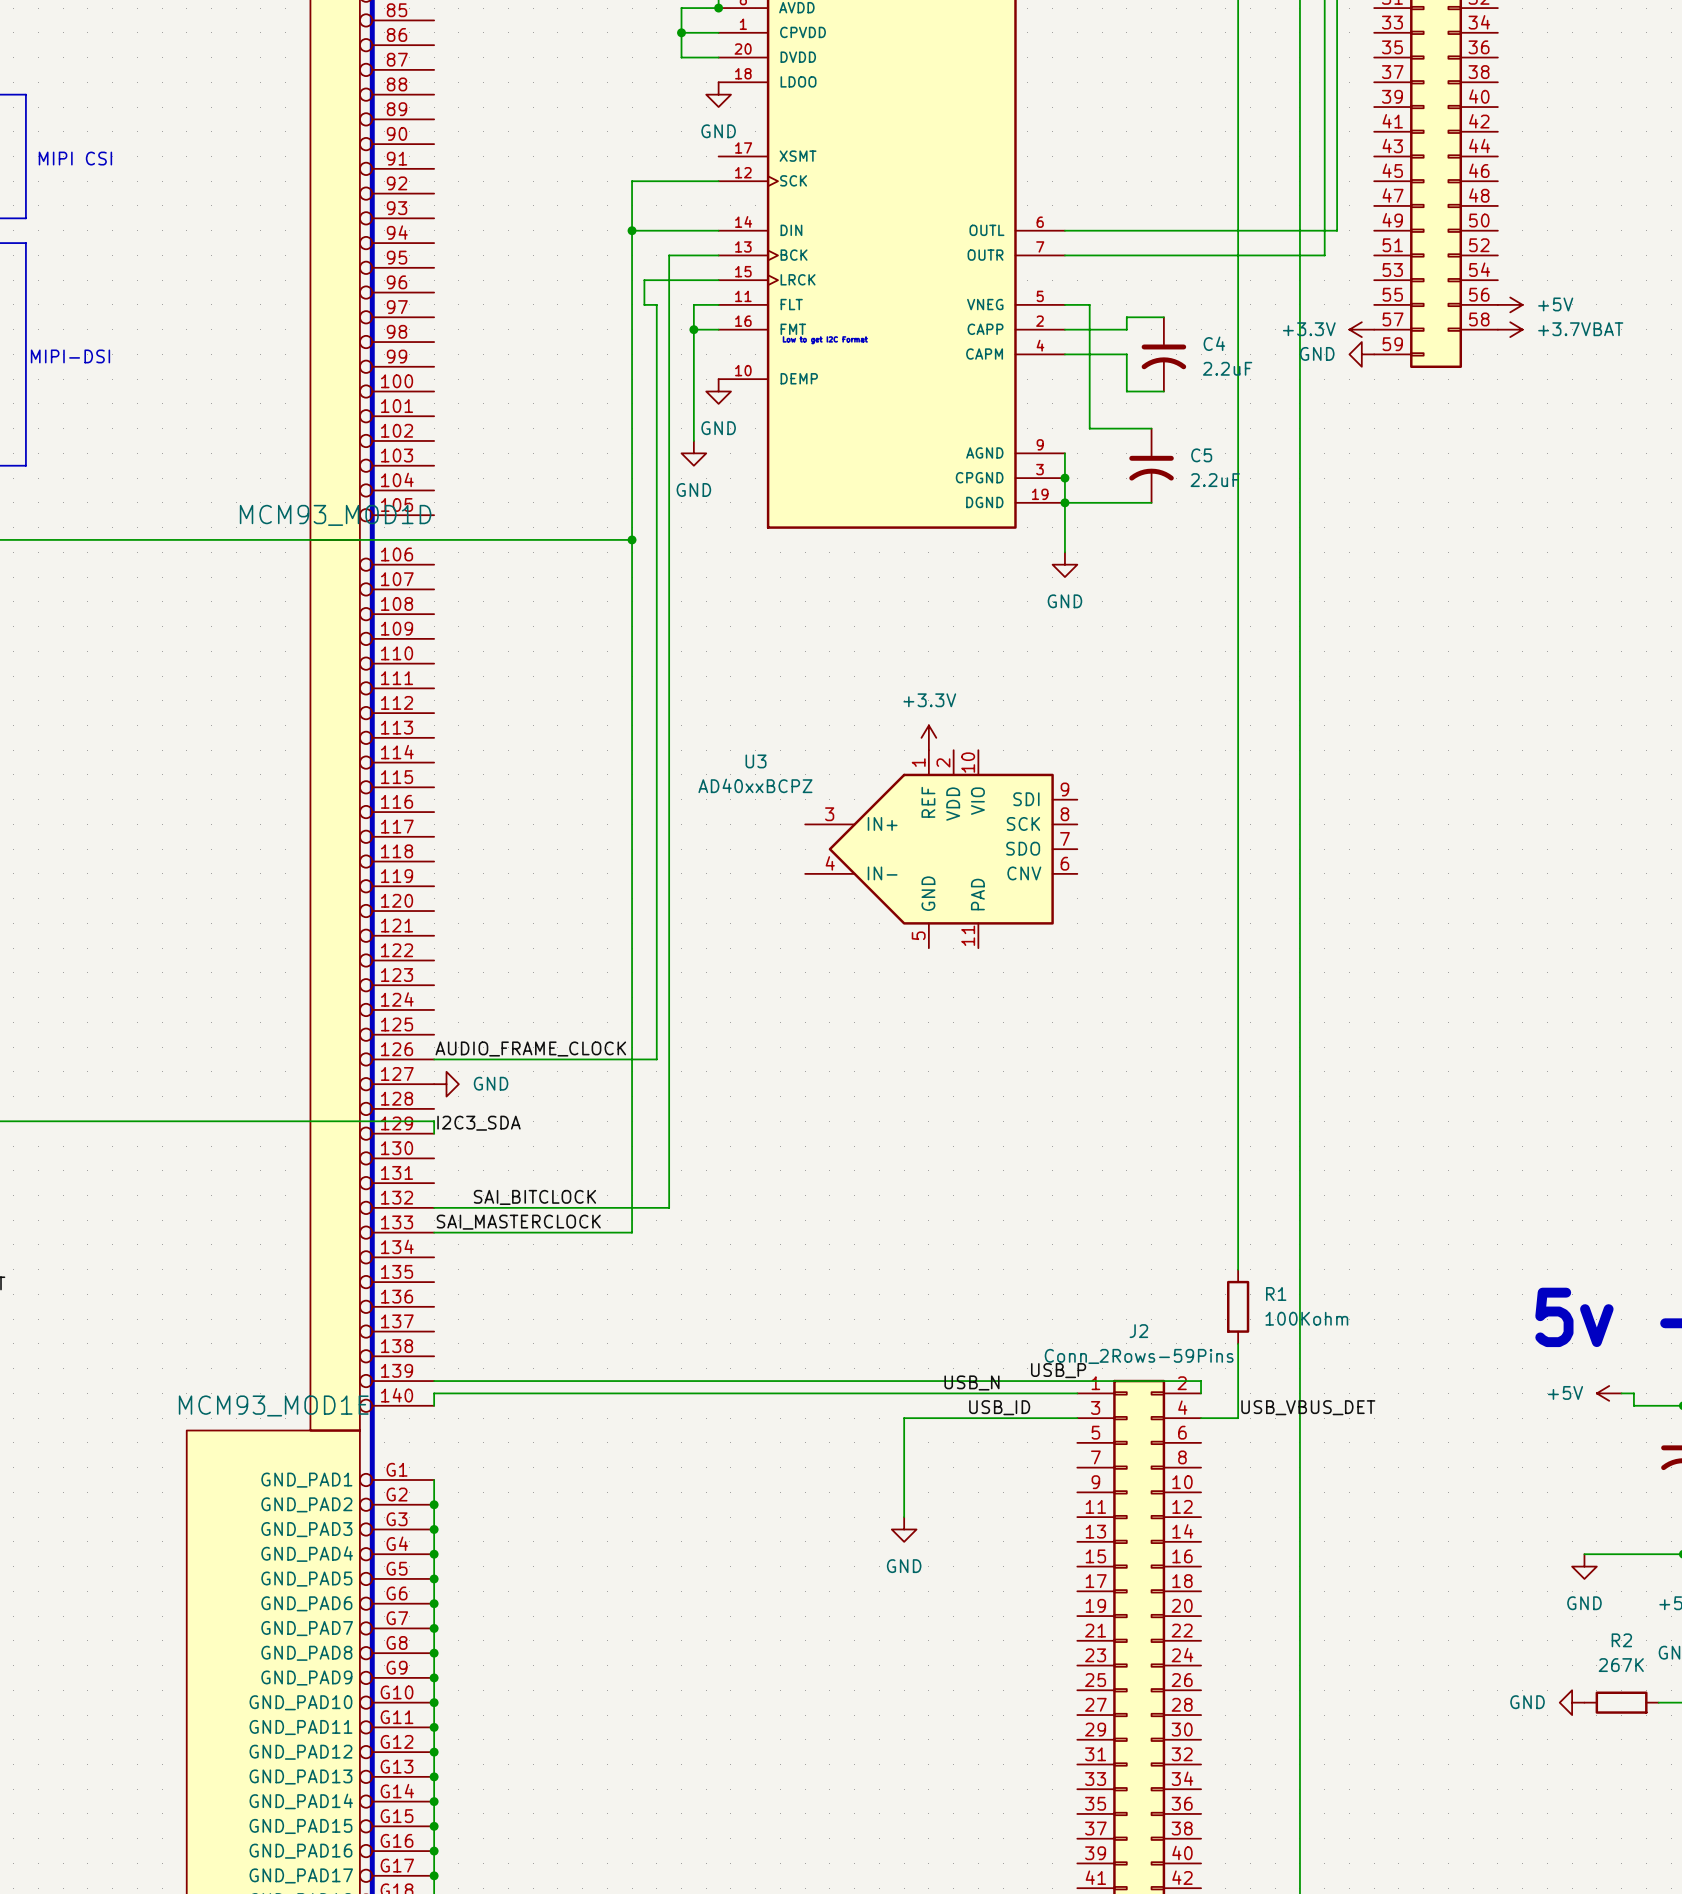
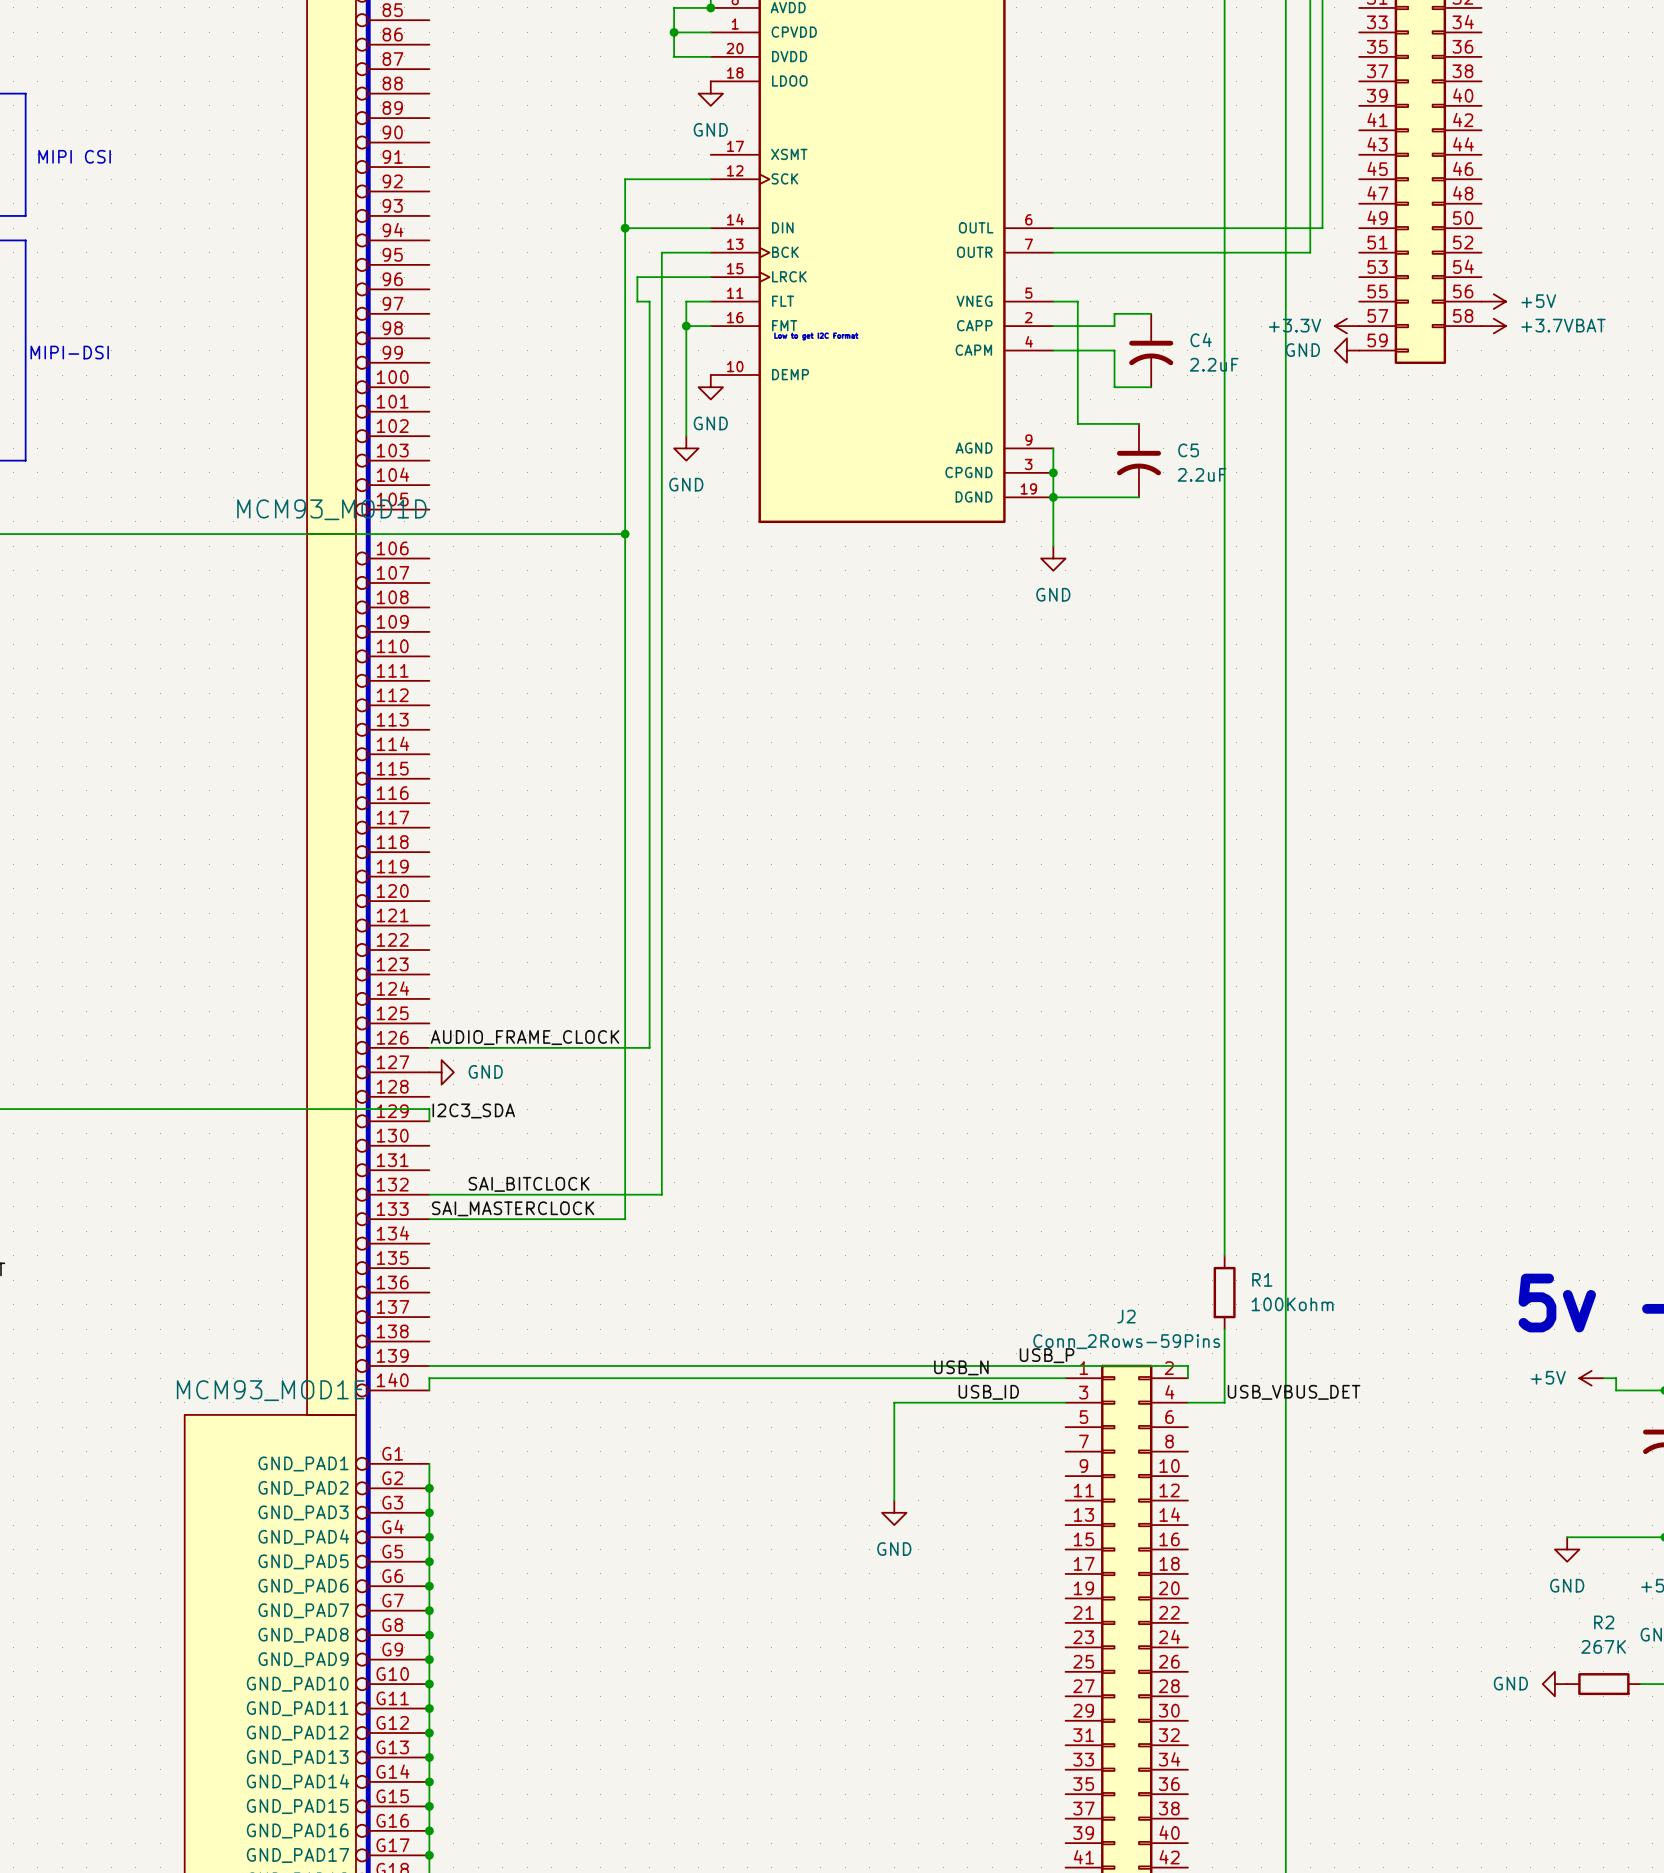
power symbol: +3.3V (928, 737) -> none
U3: AD40xxBCPZ (941, 849) -> none

